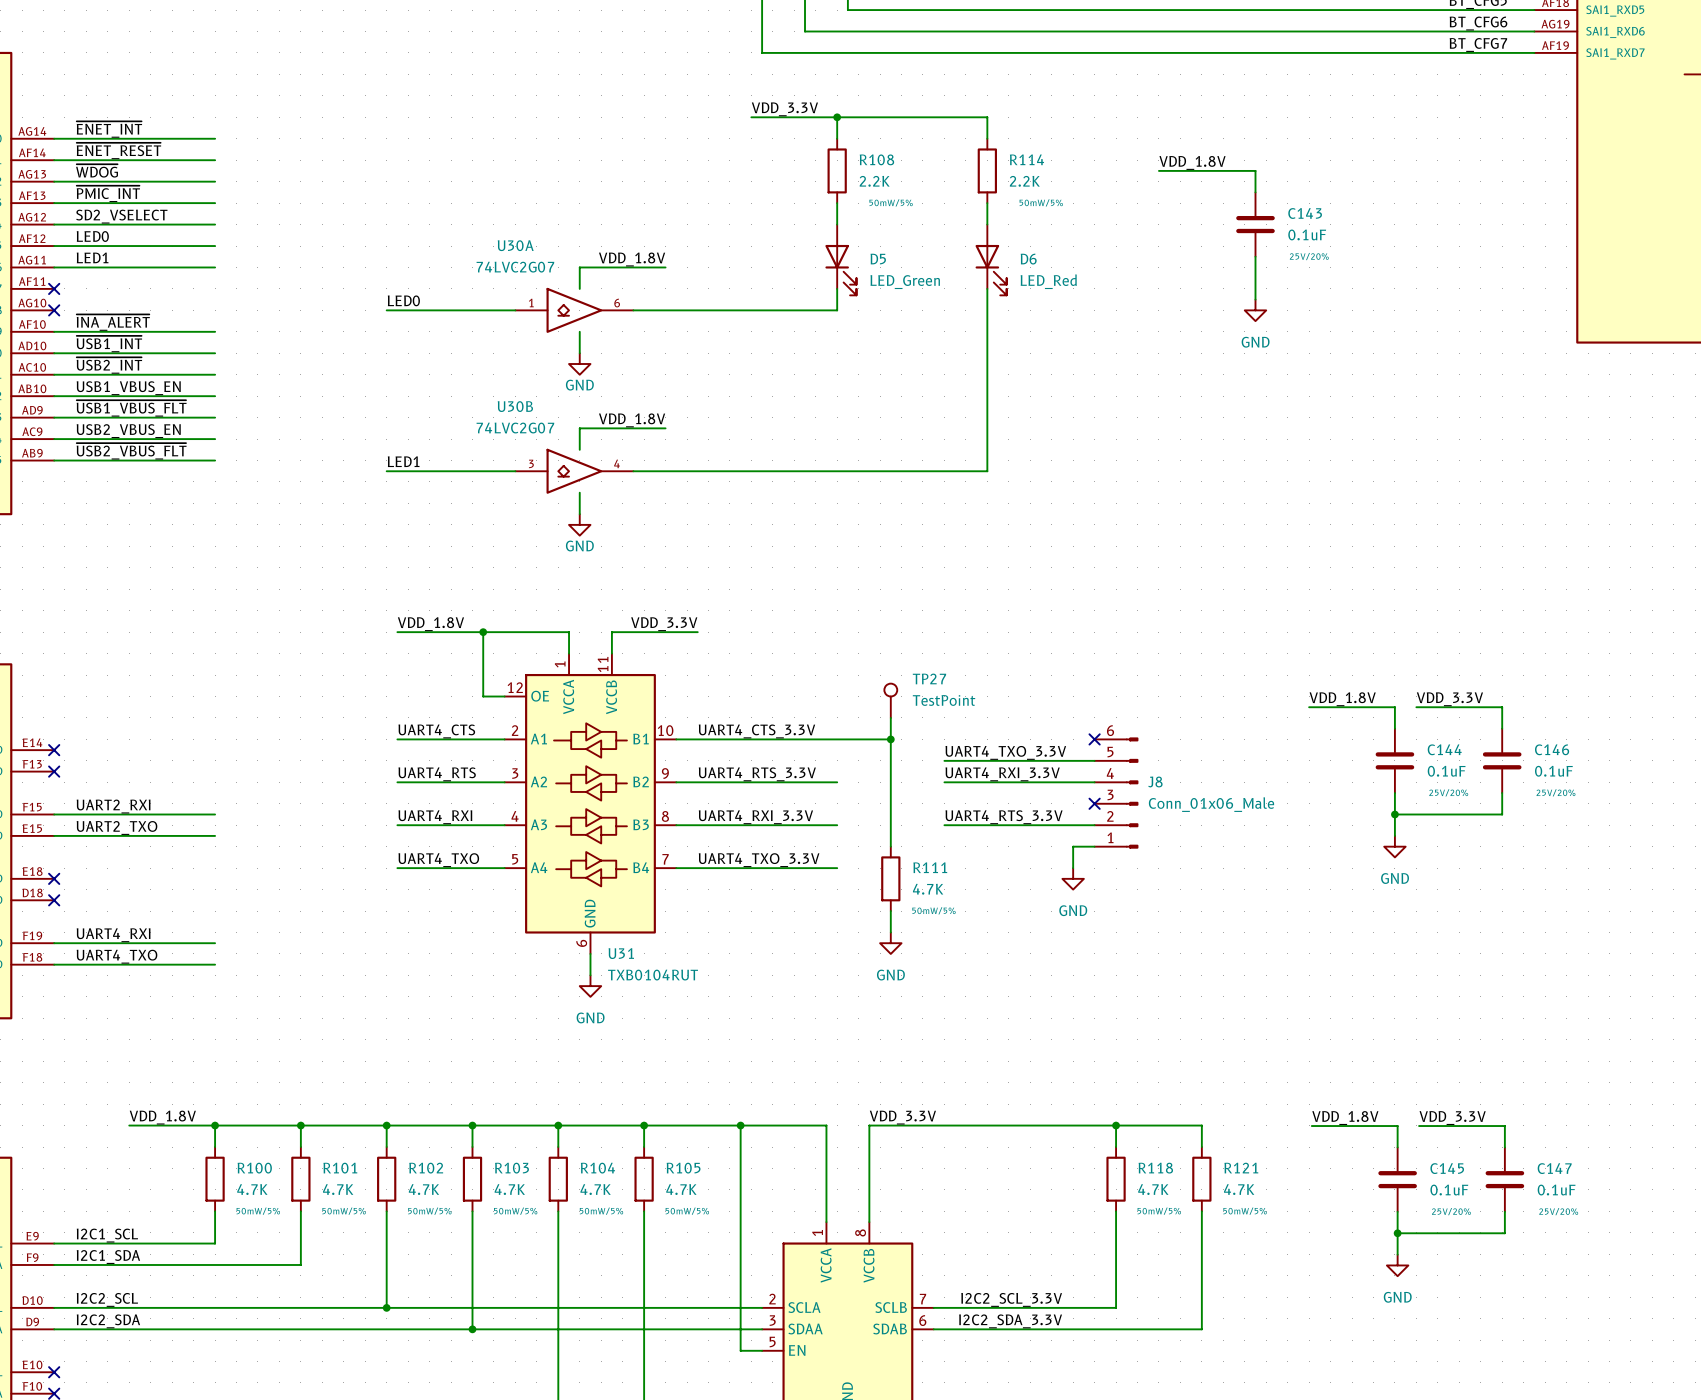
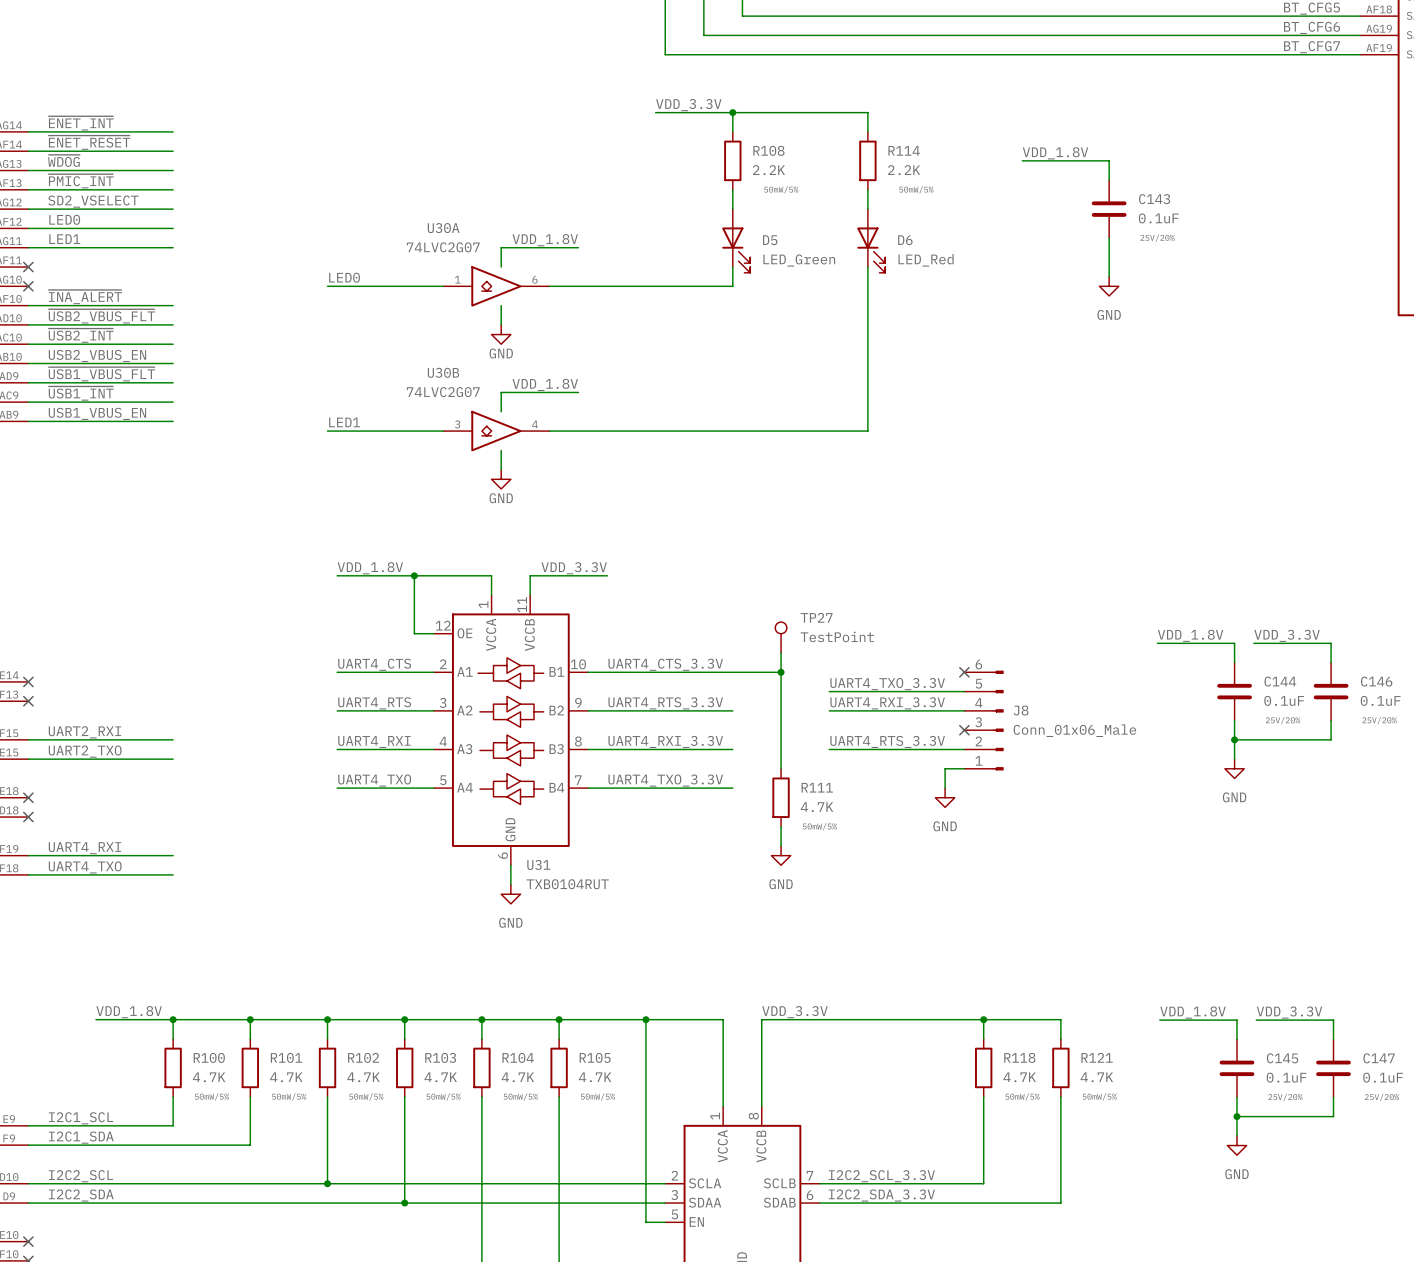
label: ~{USB1_INT} (109, 344) -> ~{USB2_VBUS_FLT} (101, 316)
label: USB1_VBUS_EN (128, 388) -> USB2_VBUS_EN (97, 355)
label: USB2_VBUS_EN (128, 431) -> ~{USB1_INT} (81, 393)
label: ~{USB2_VBUS_FLT} (131, 451) -> USB1_VBUS_EN (97, 413)

